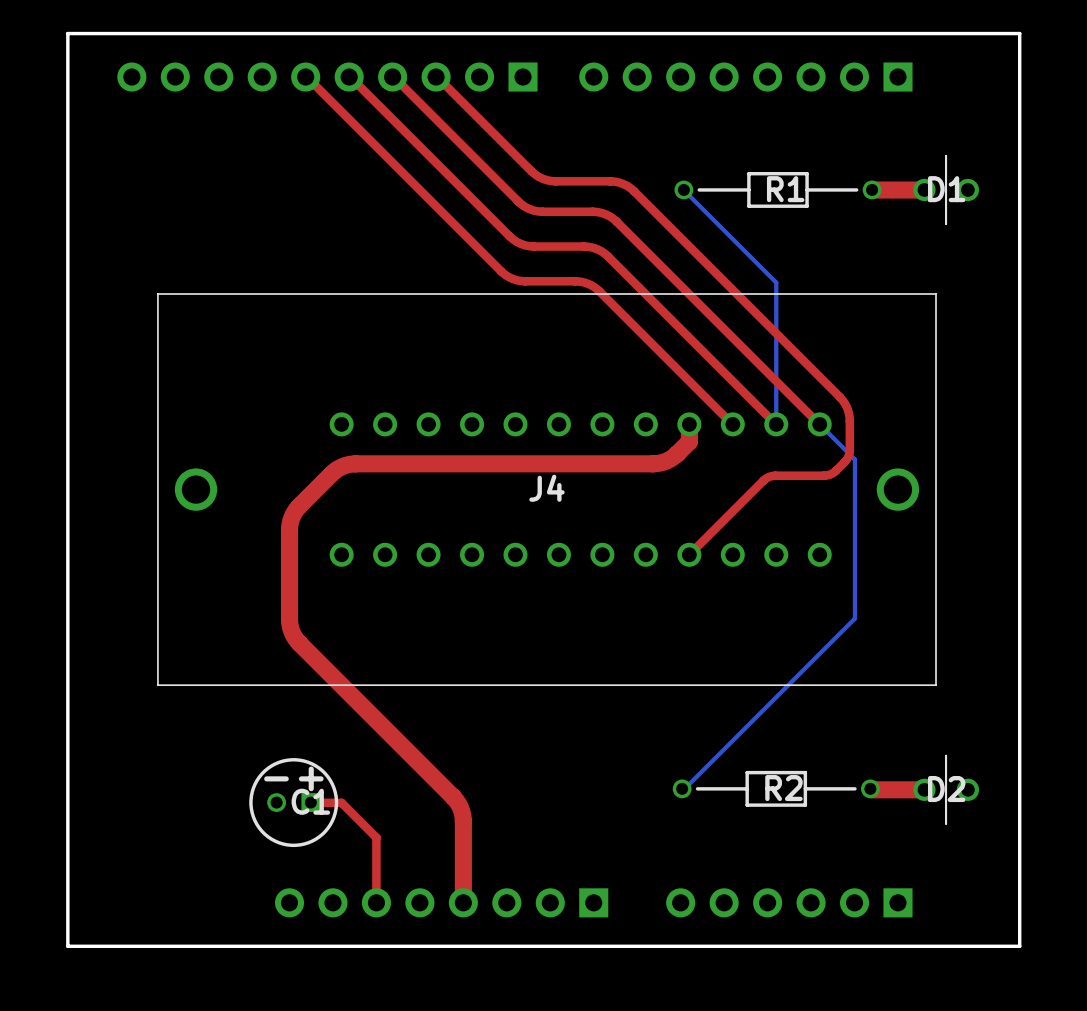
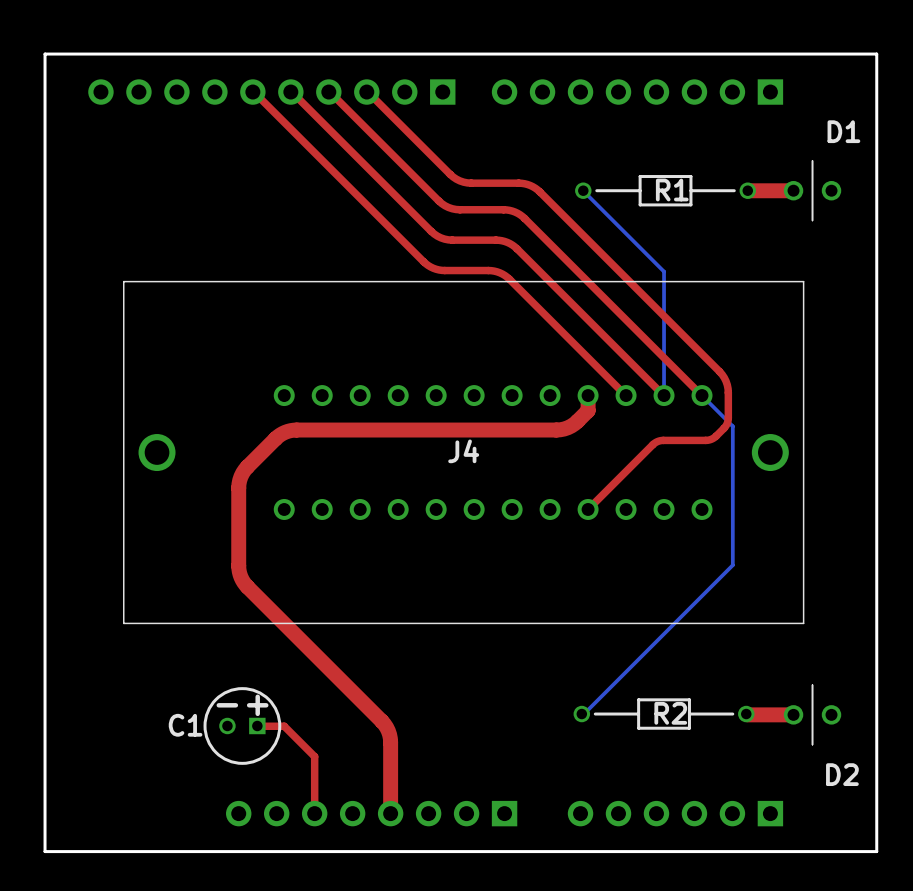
D1 name position: D1 (946, 189) -> D1 (843, 131)
D2 name position: D2 (946, 789) -> D2 (842, 774)
C1 name position: C1 (310, 801) -> C1 (185, 725)

